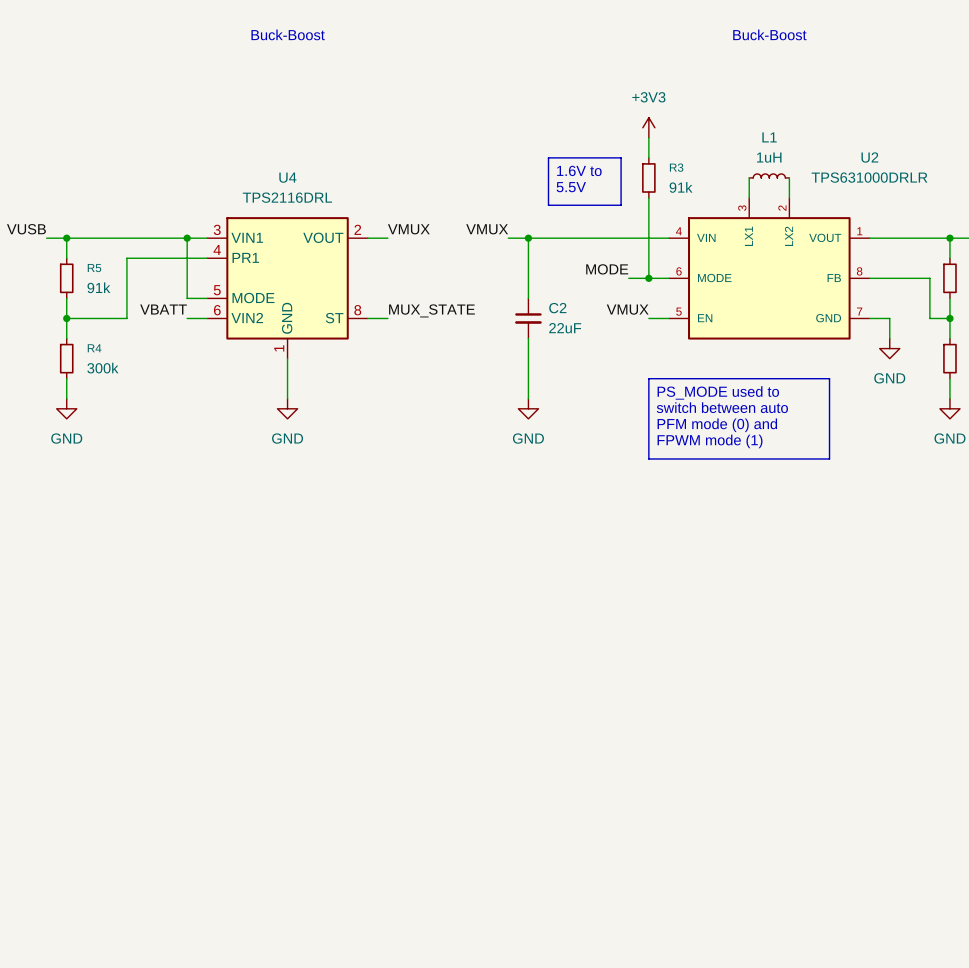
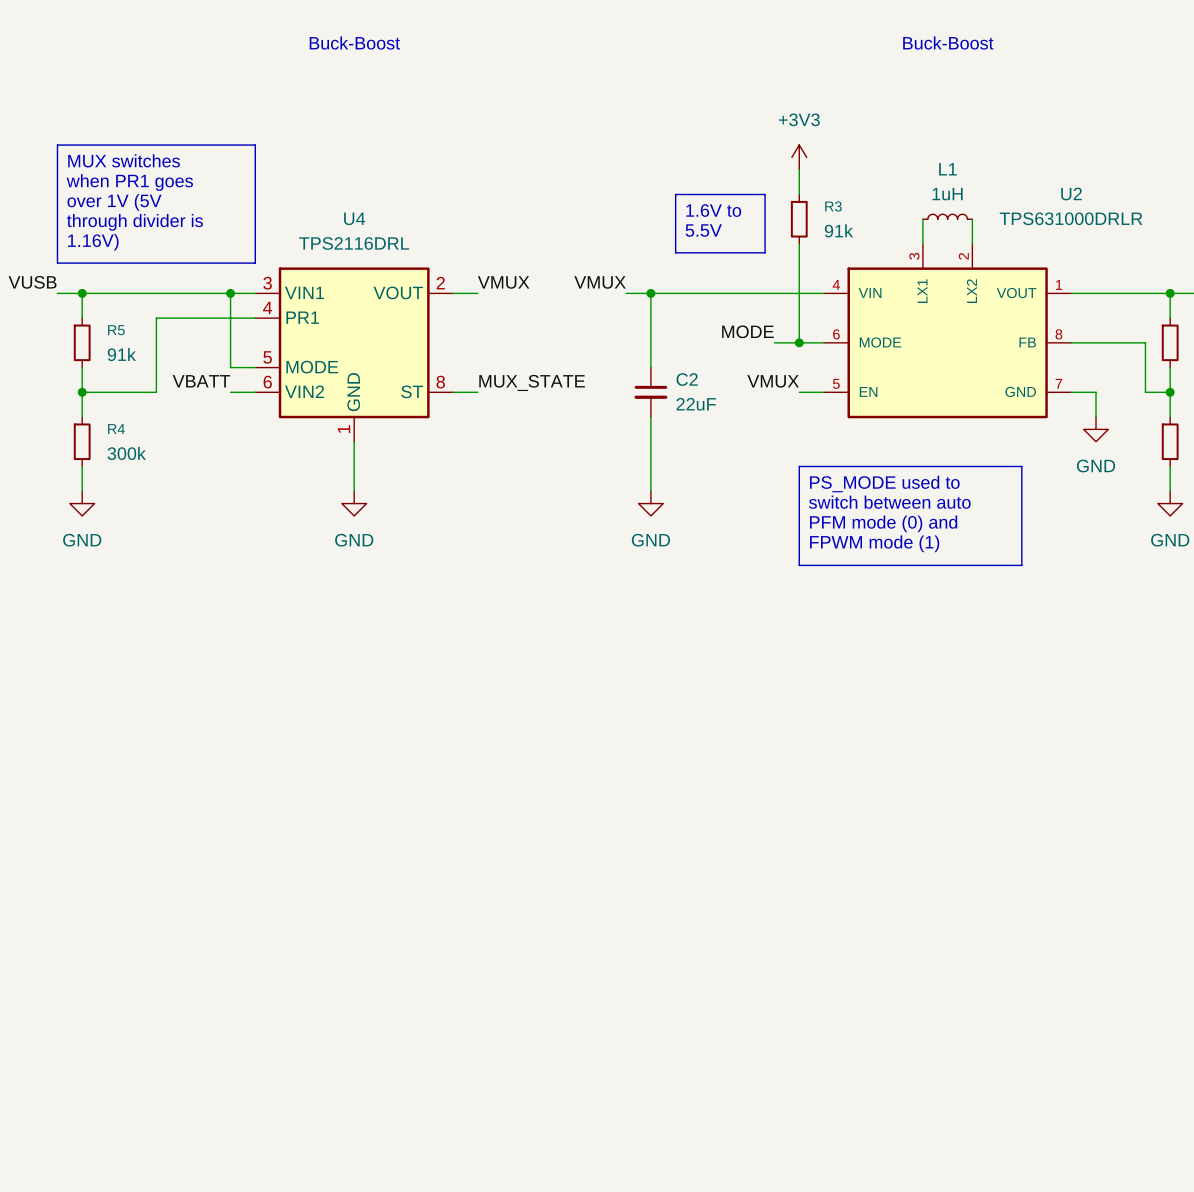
line: none -> (57, 145) (255, 145) (255, 263) (57, 263) (57, 145)
text: none -> MUX switches (124, 160)
text: none -> when PR1 goes (129, 182)
text: none -> over 1V (5V (114, 202)
text: none -> through divider is (134, 222)
text: none -> 1.16V) (93, 242)

